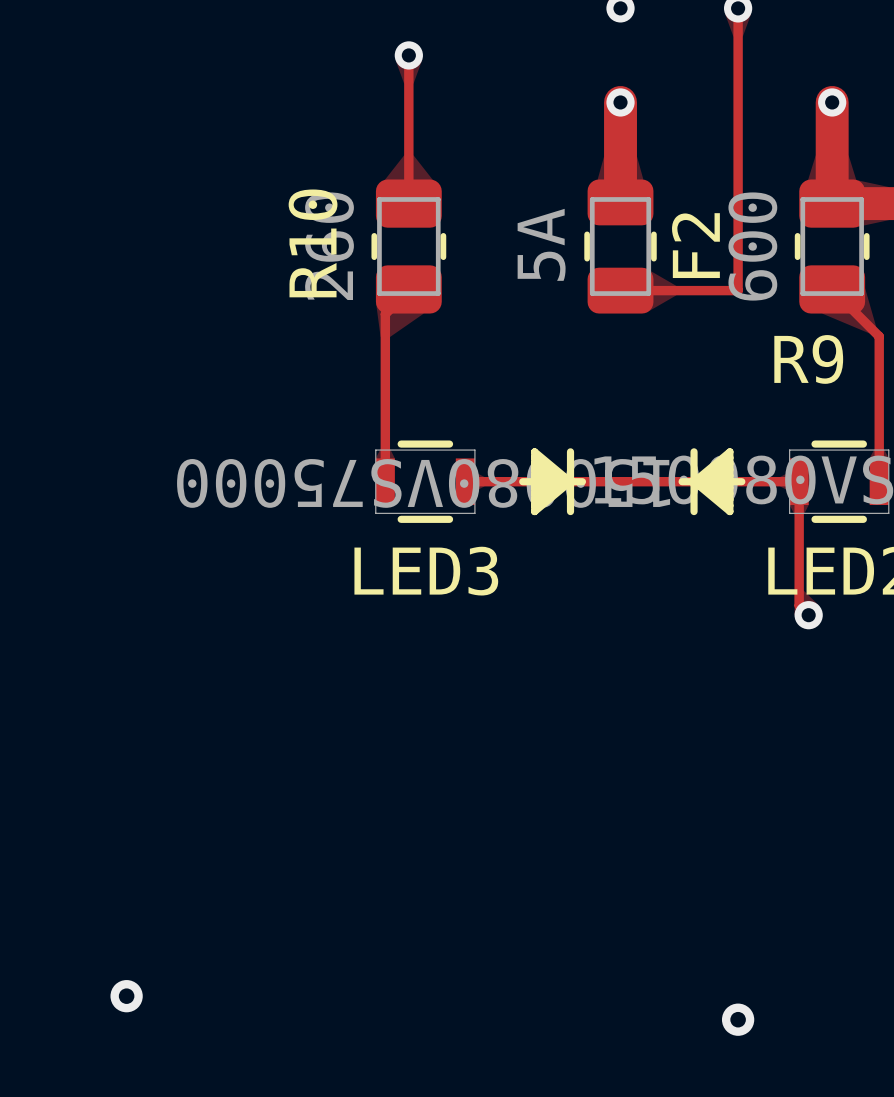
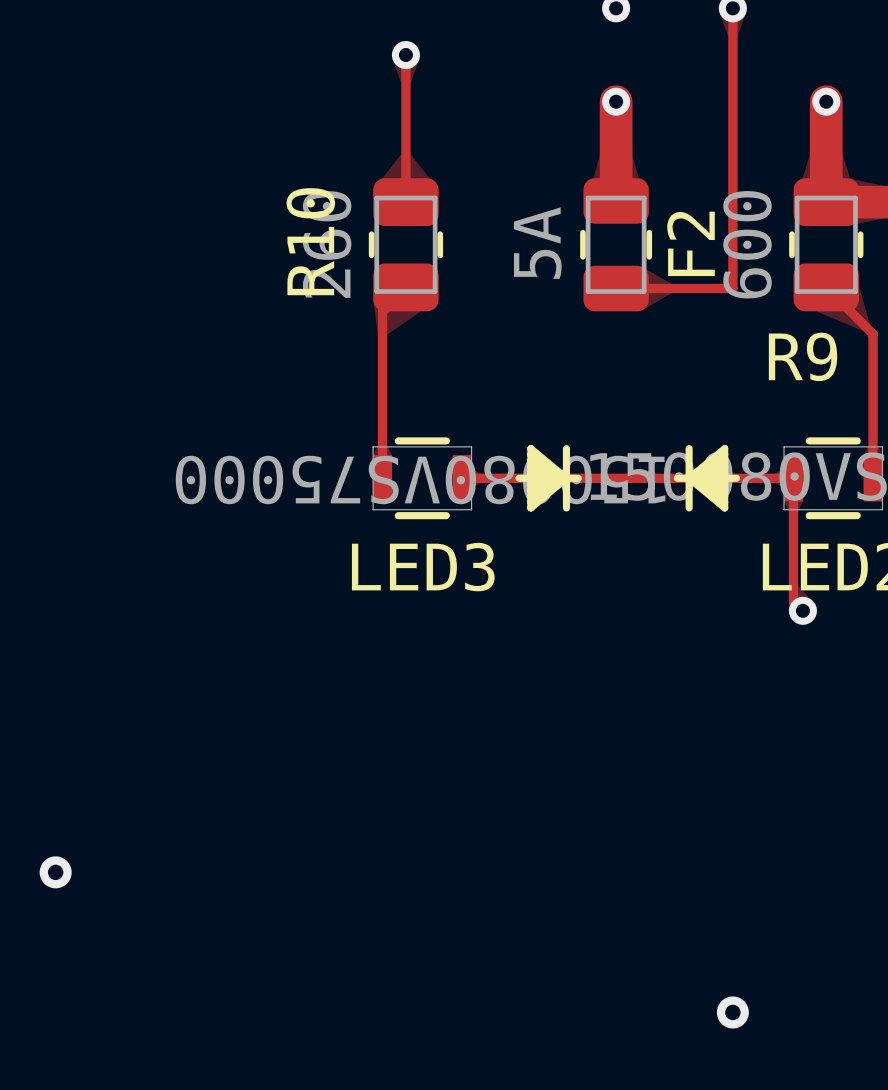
via position: (126, 996) -> (55, 872)

